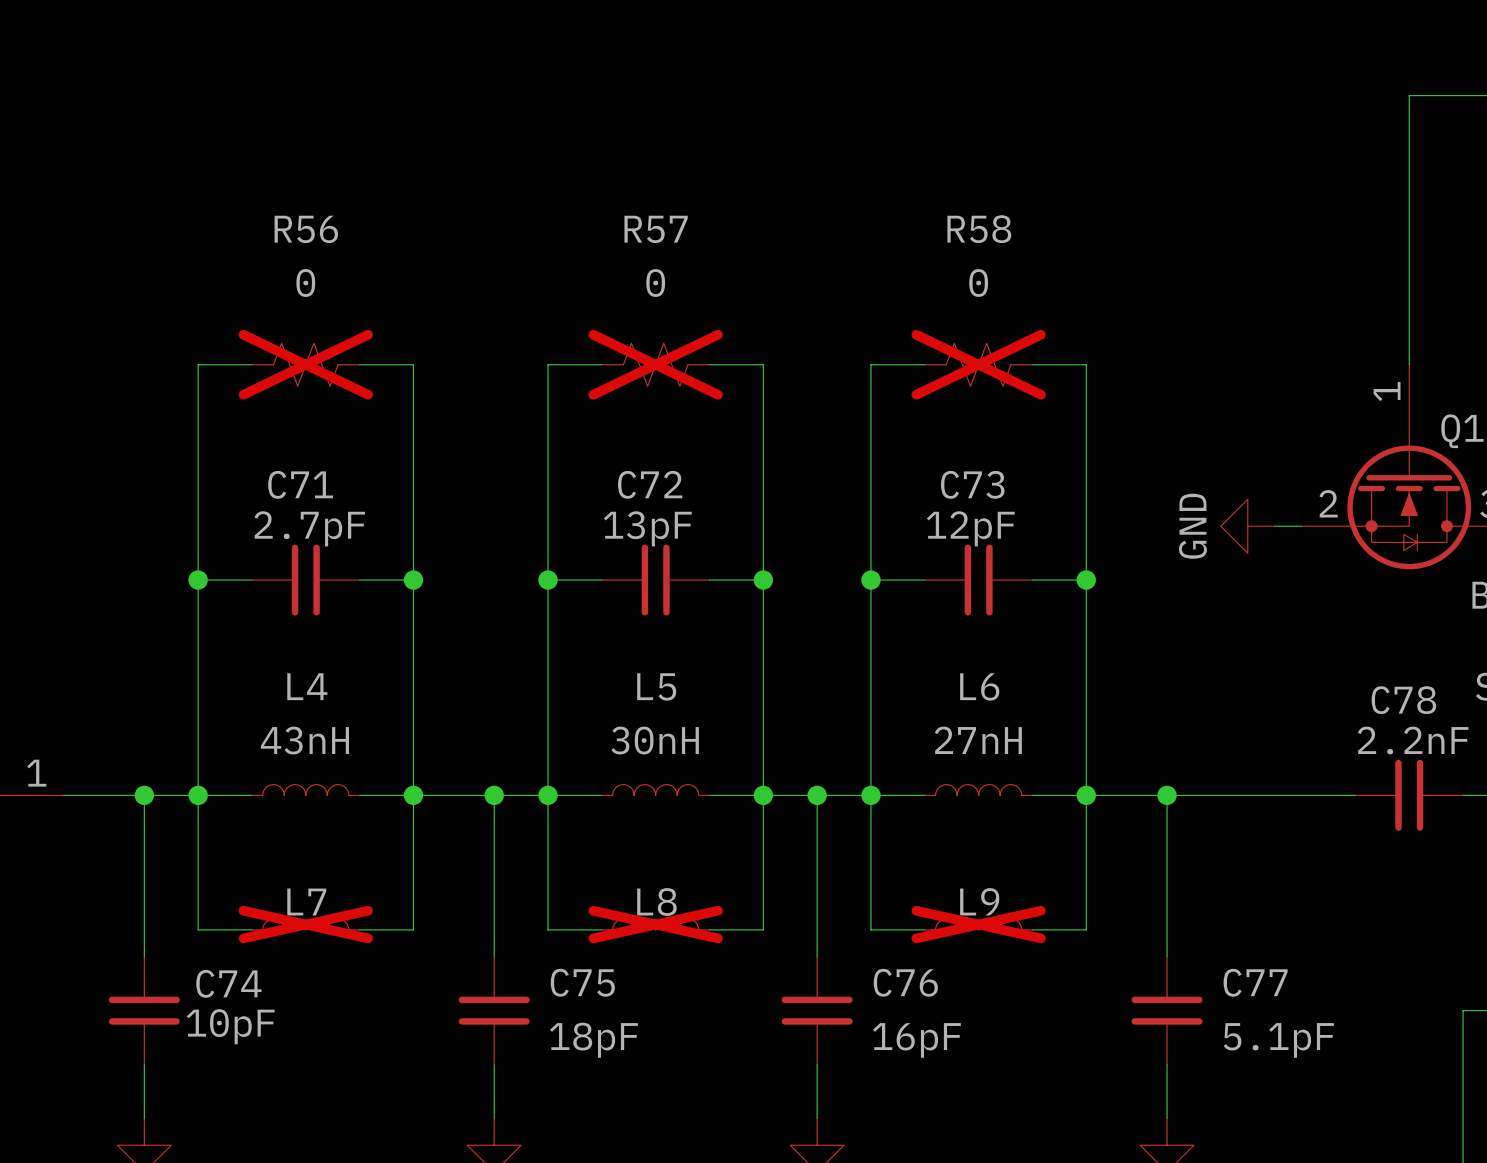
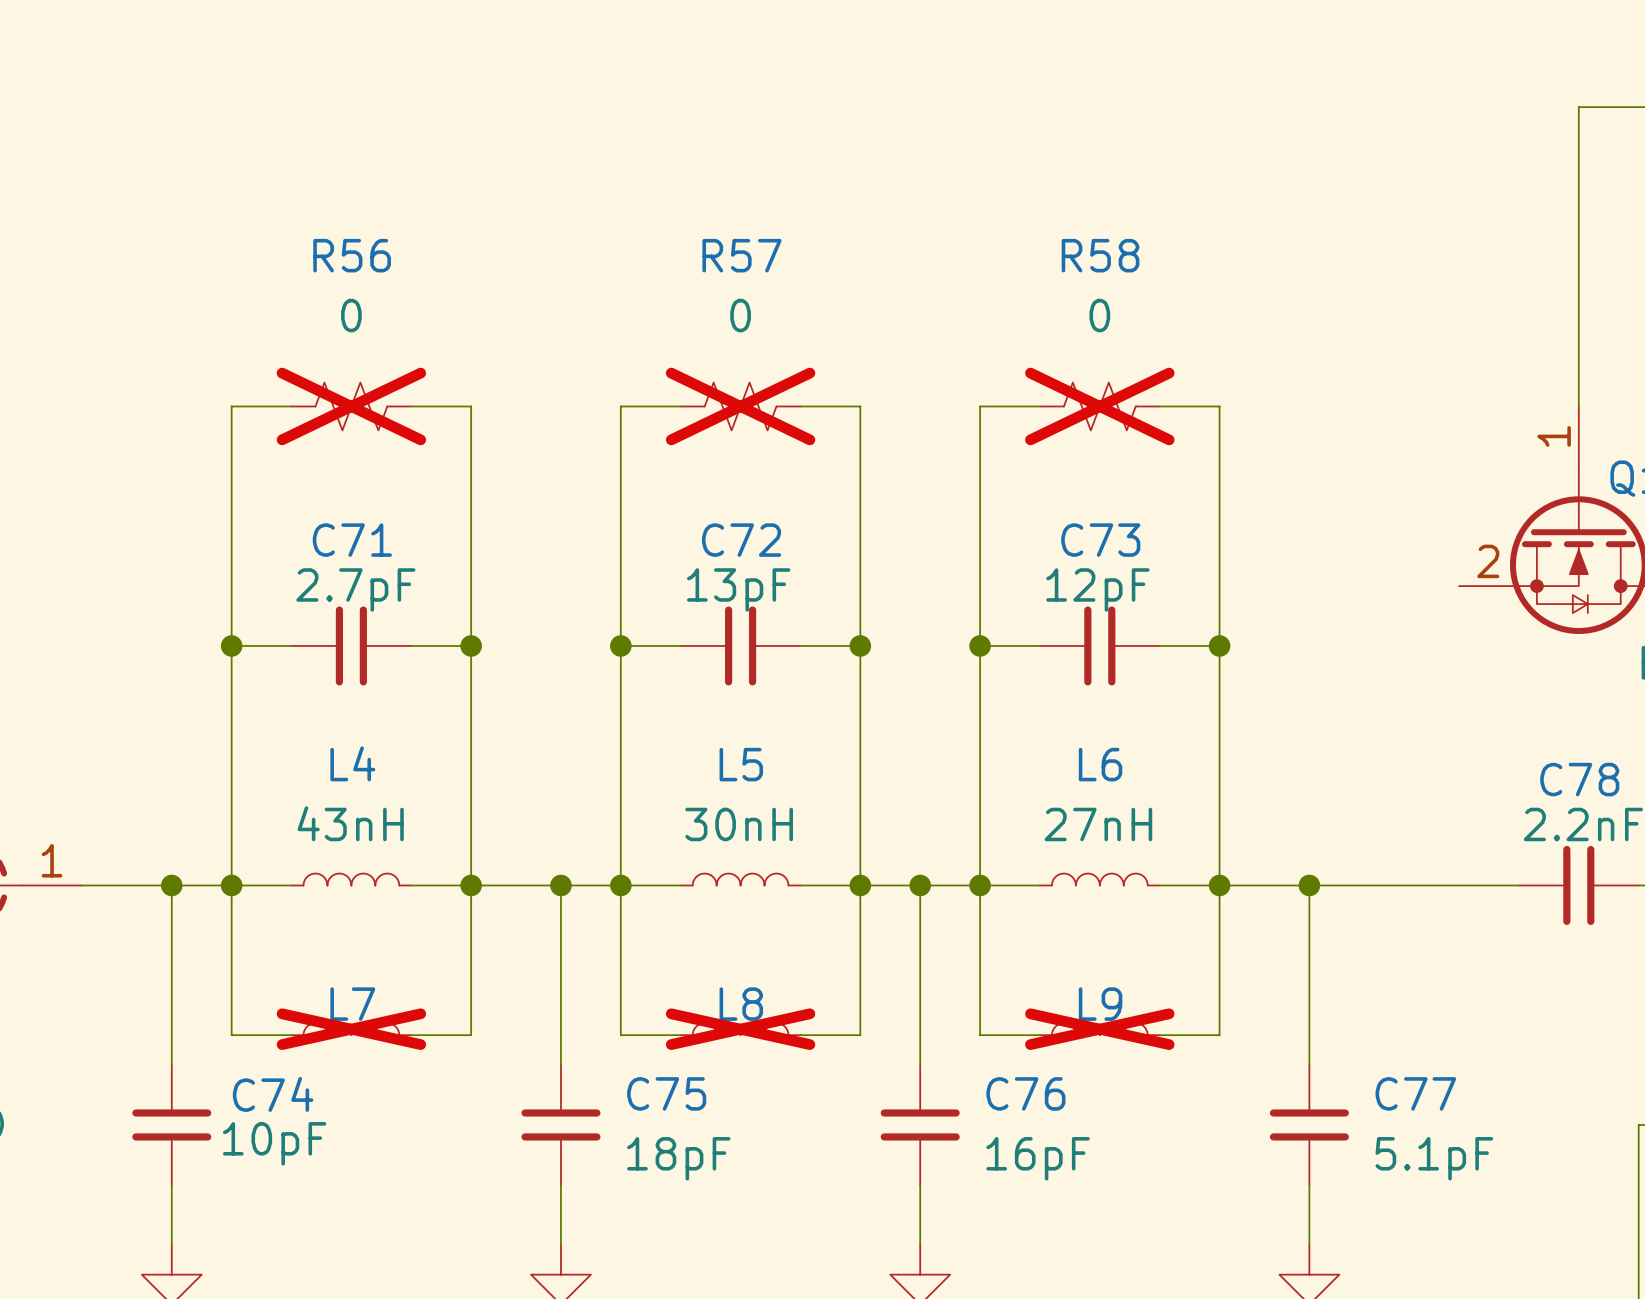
power symbol: GND (1247, 526) -> none
wire: (1274, 526) (1301, 526) -> none

